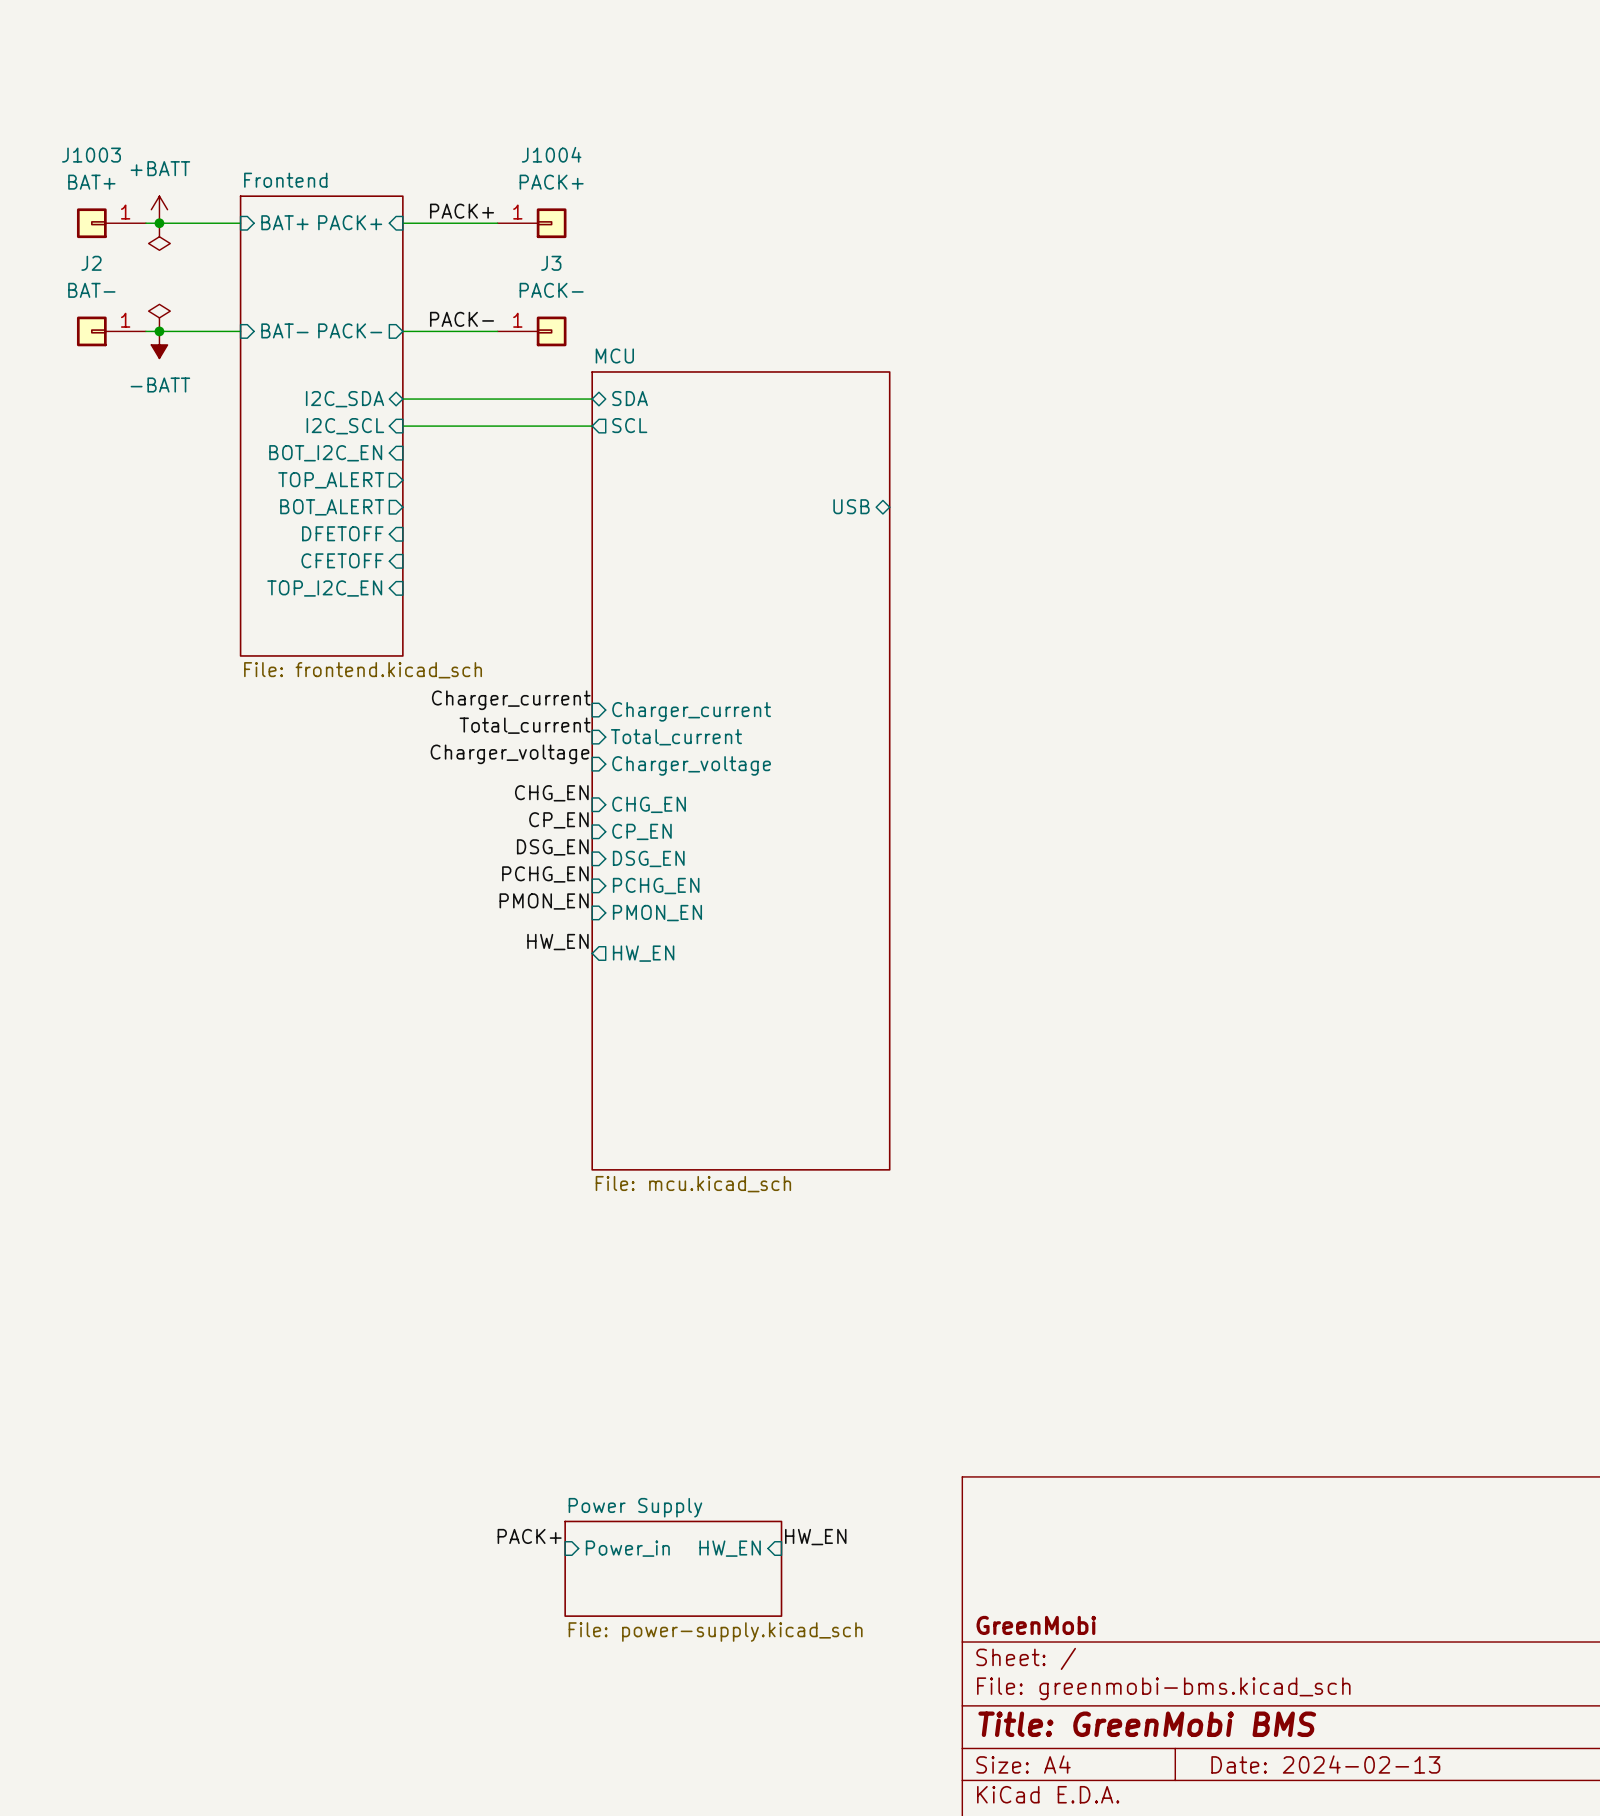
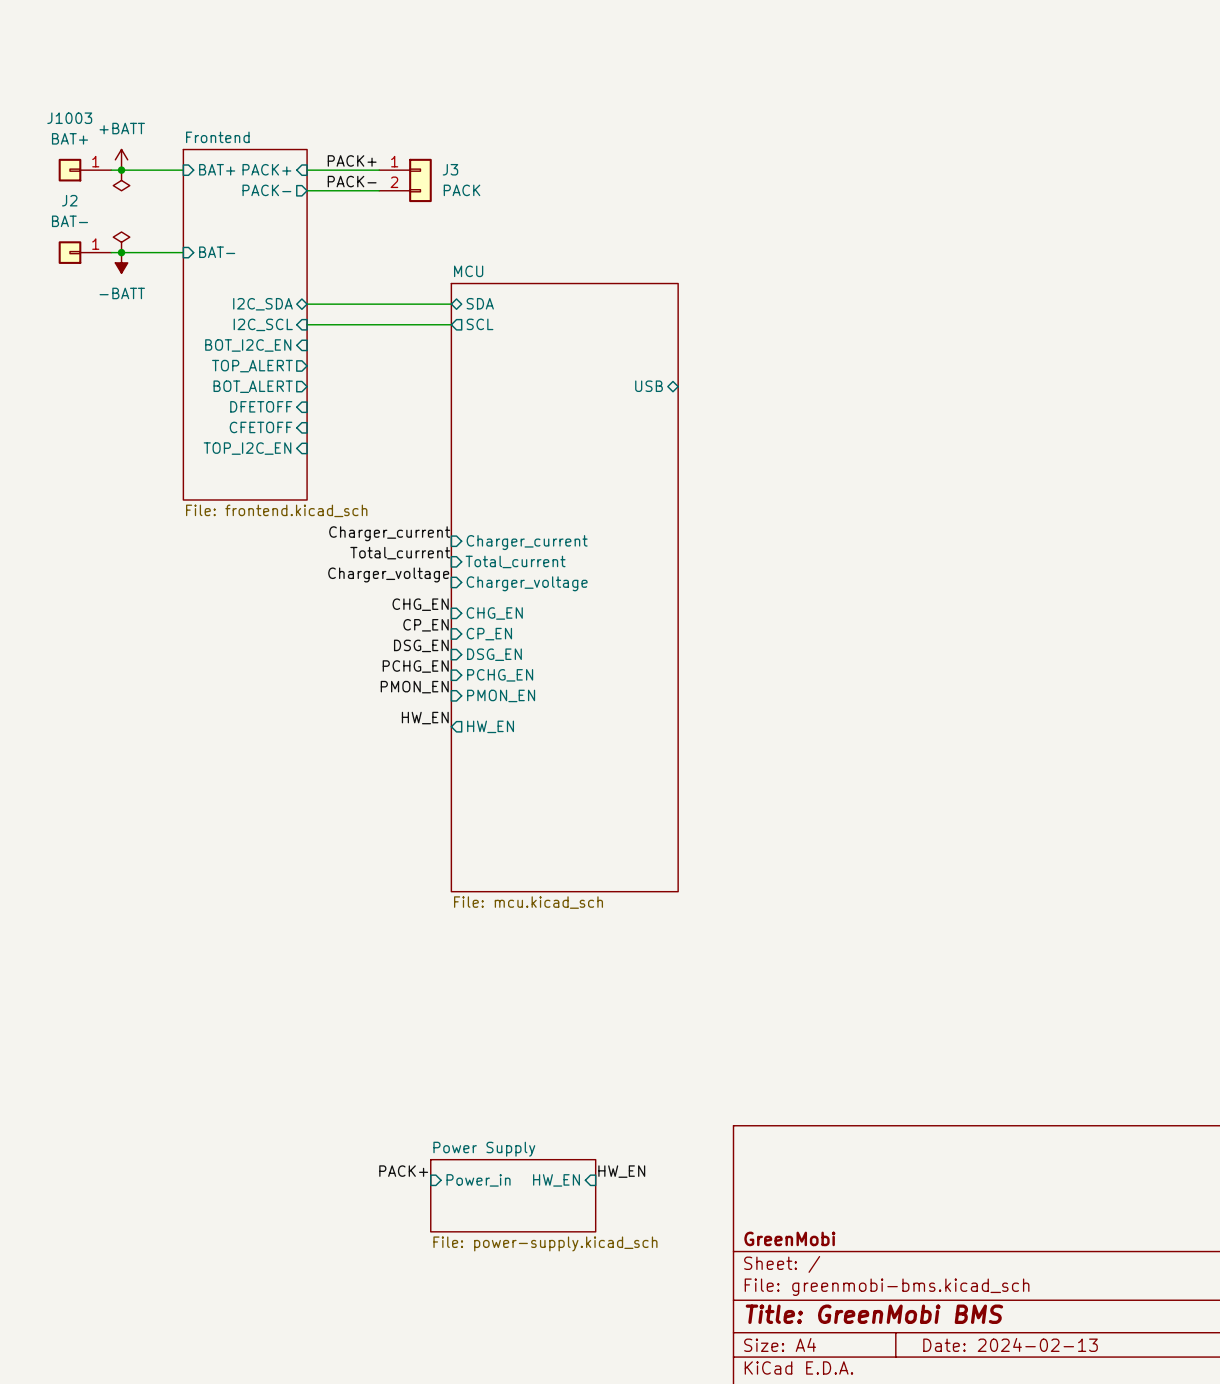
J1004: PACK+ (532, 223) -> none
J3 name position: J3 (551, 263) -> J3 (450, 169)
J3 value: PACK- (551, 290) -> PACK (462, 190)
J3 symbol: [497, 316, 567, 347] -> [379, 158, 432, 203]
label position: PACK- (462, 319) -> PACK- (352, 181)
sheet pin position: PACK- (350, 330) -> PACK- (266, 190)
wire: (402, 331) (497, 331) -> (307, 190) (379, 190)

